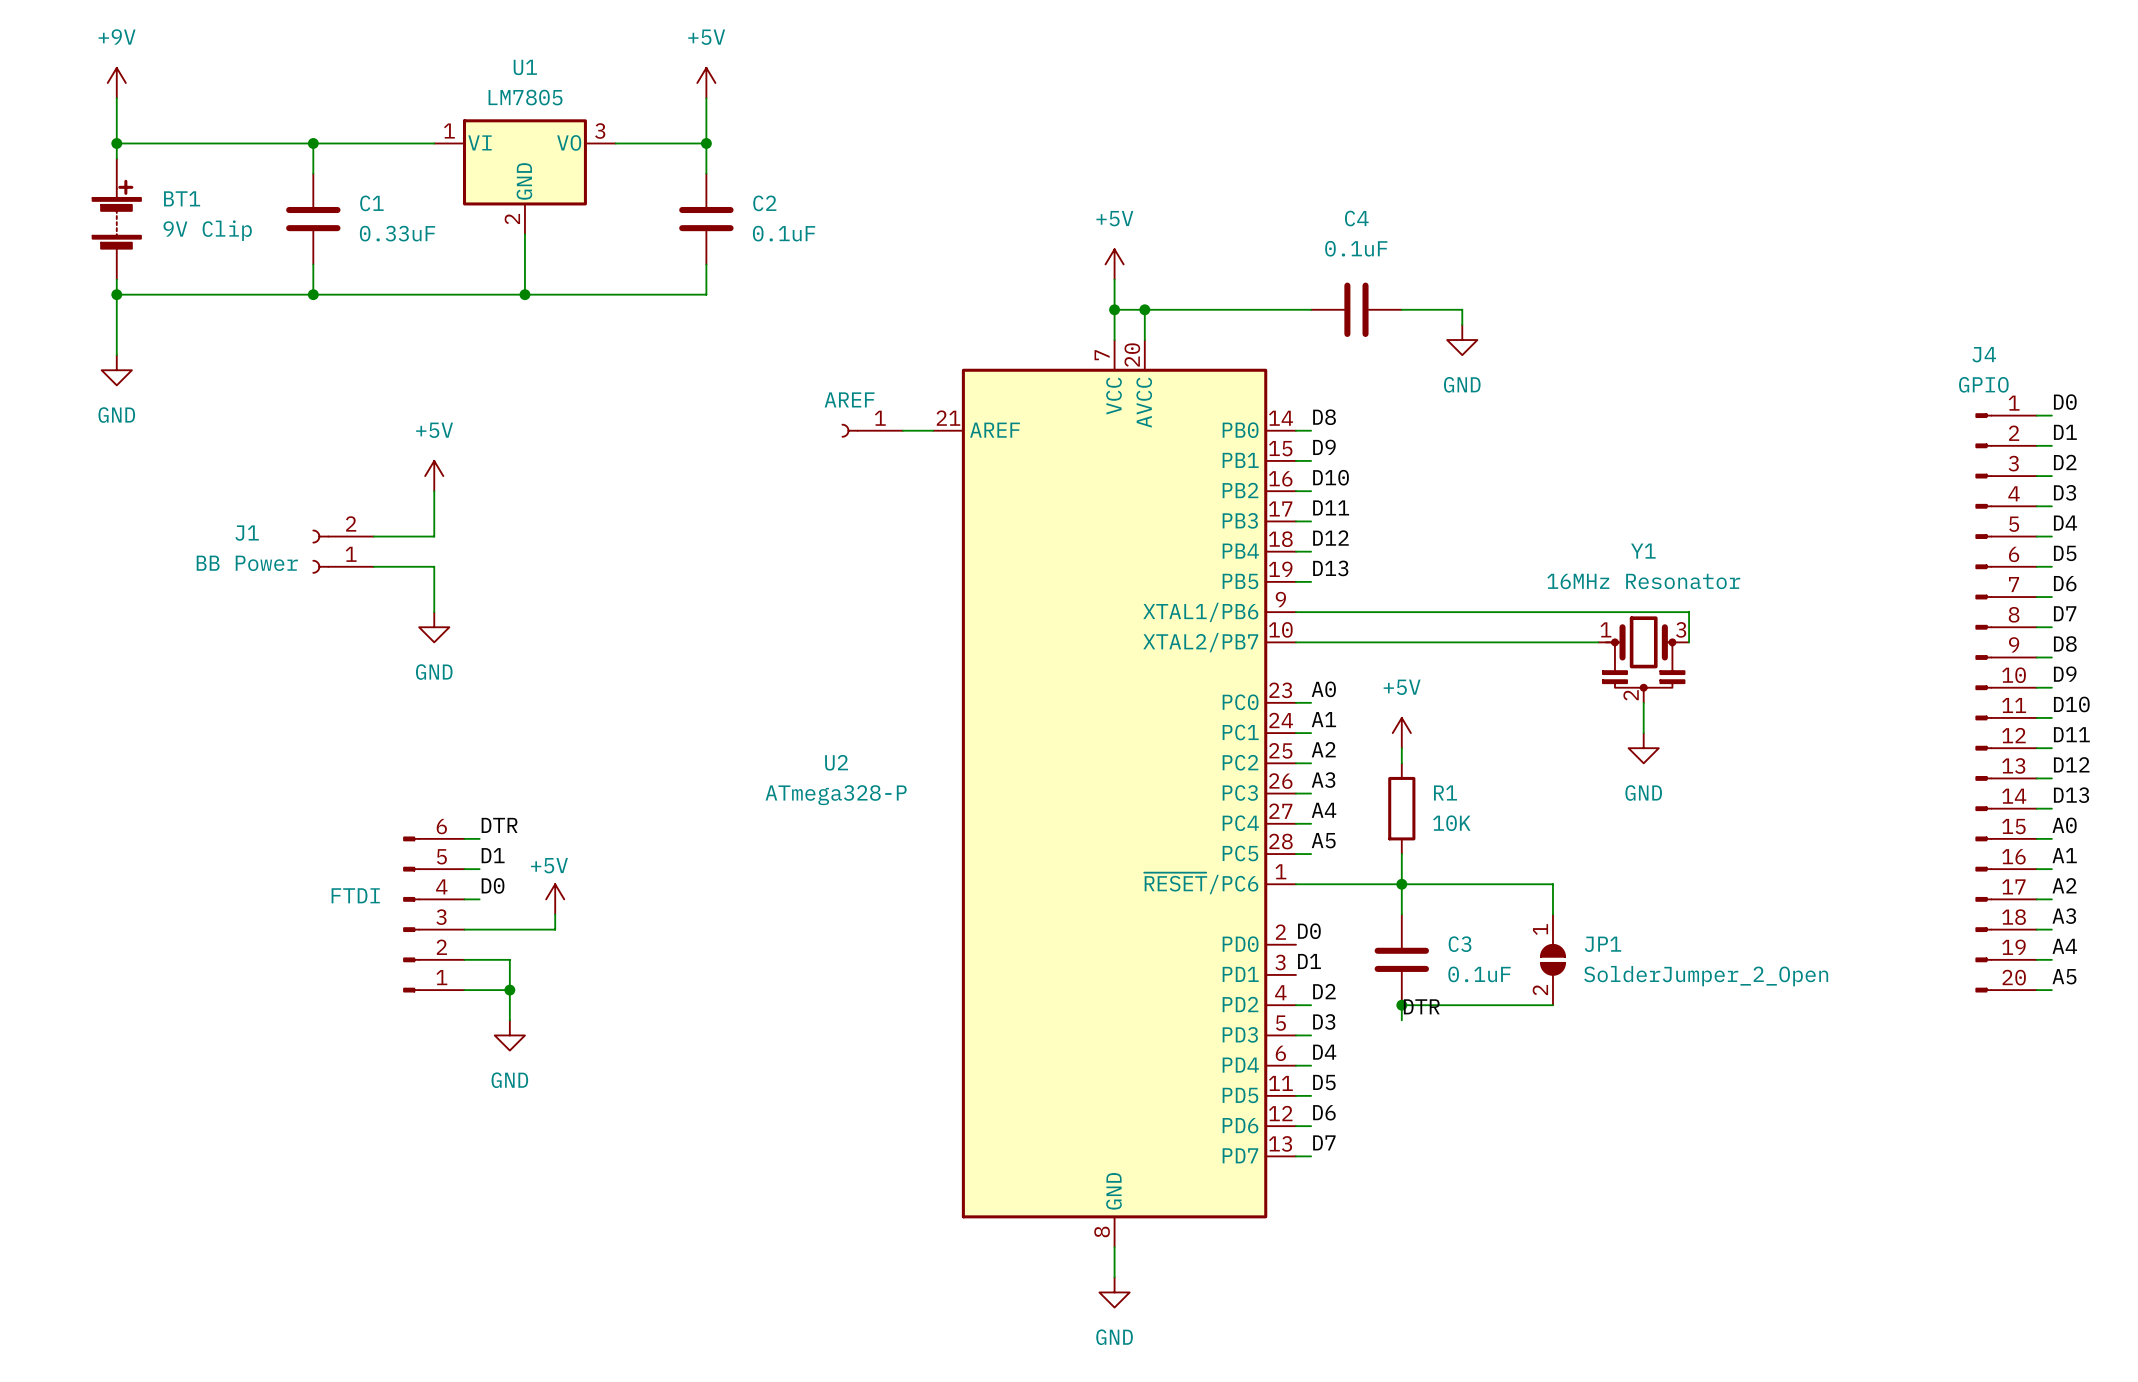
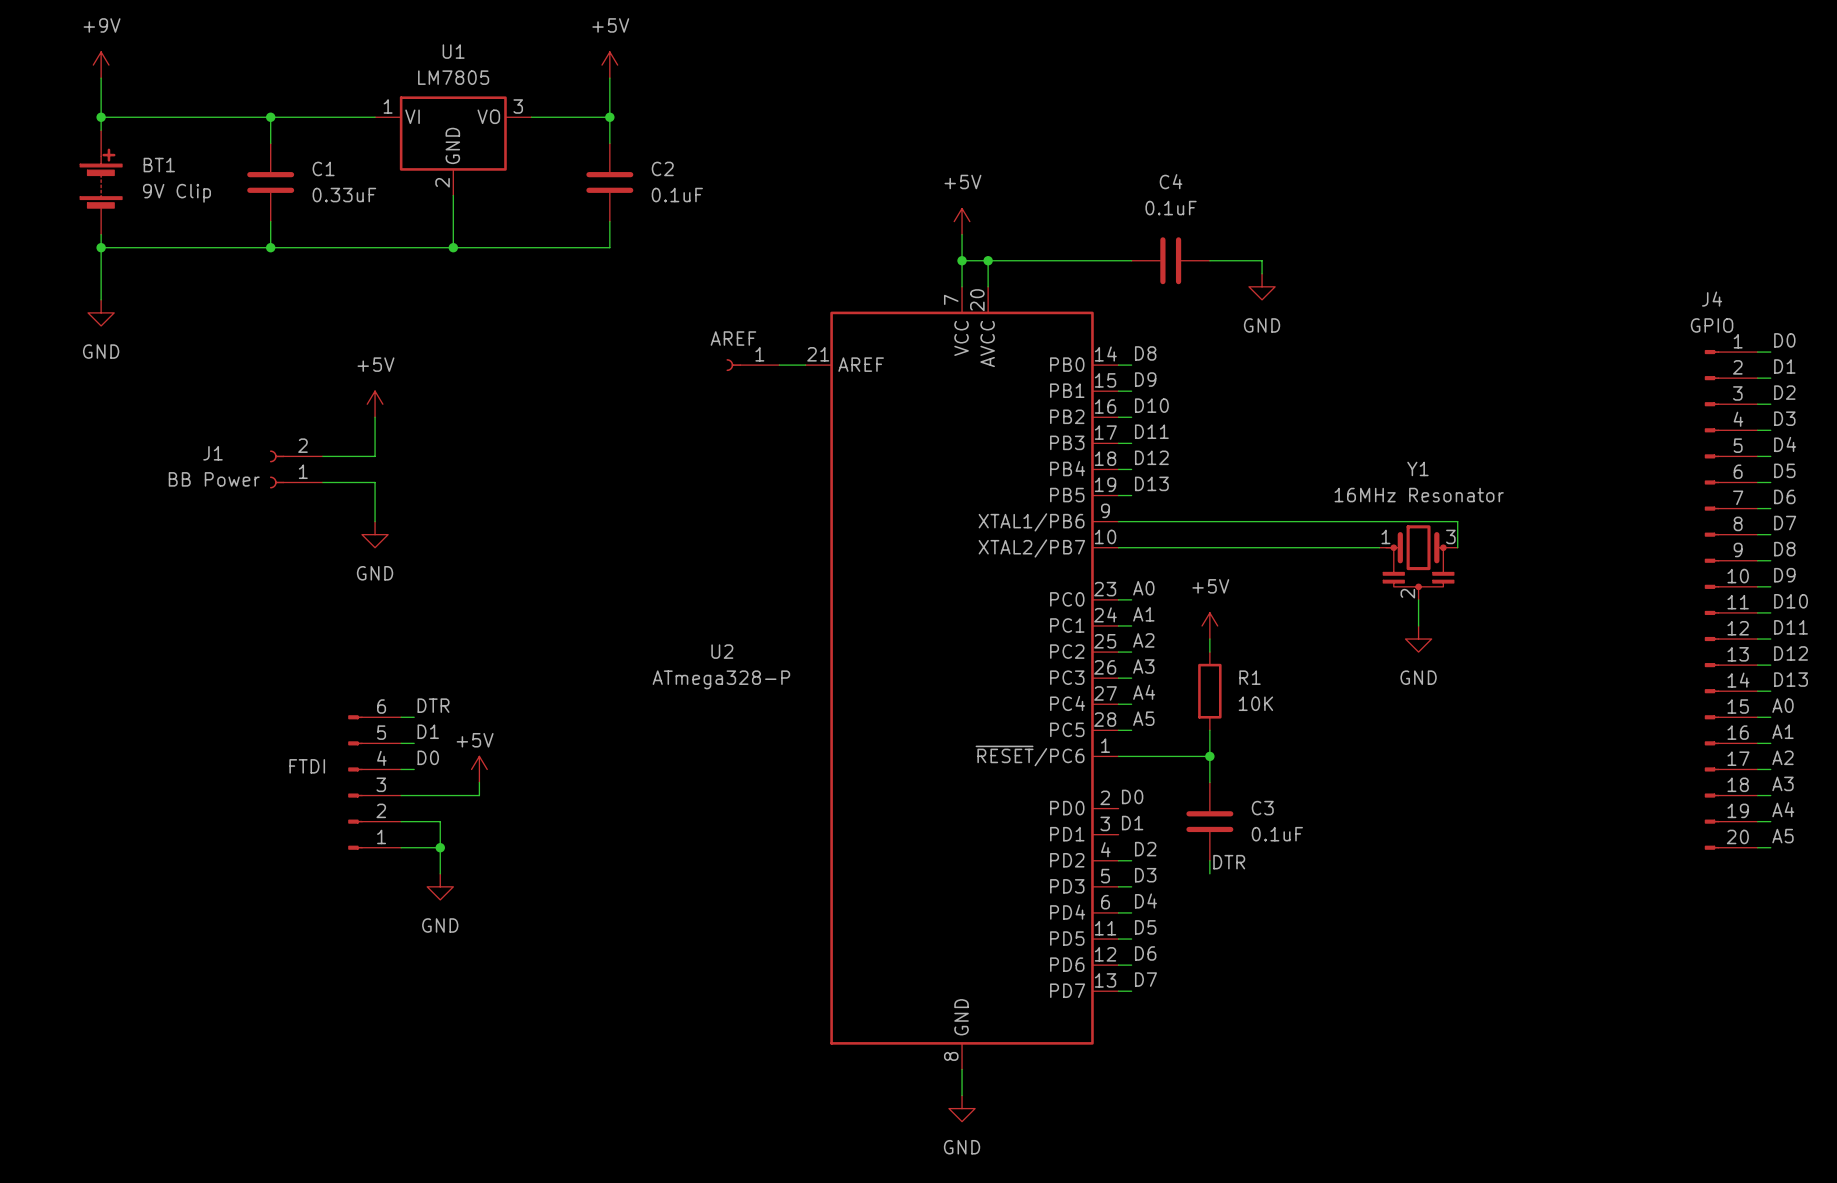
wire: (1401, 884) (1552, 884) (1552, 914) -> none
JP1: SolderJumper_2_Open (1552, 959) -> none
wire: (1401, 1005) (1552, 1005) -> none
junction: (1401, 1005) -> none

